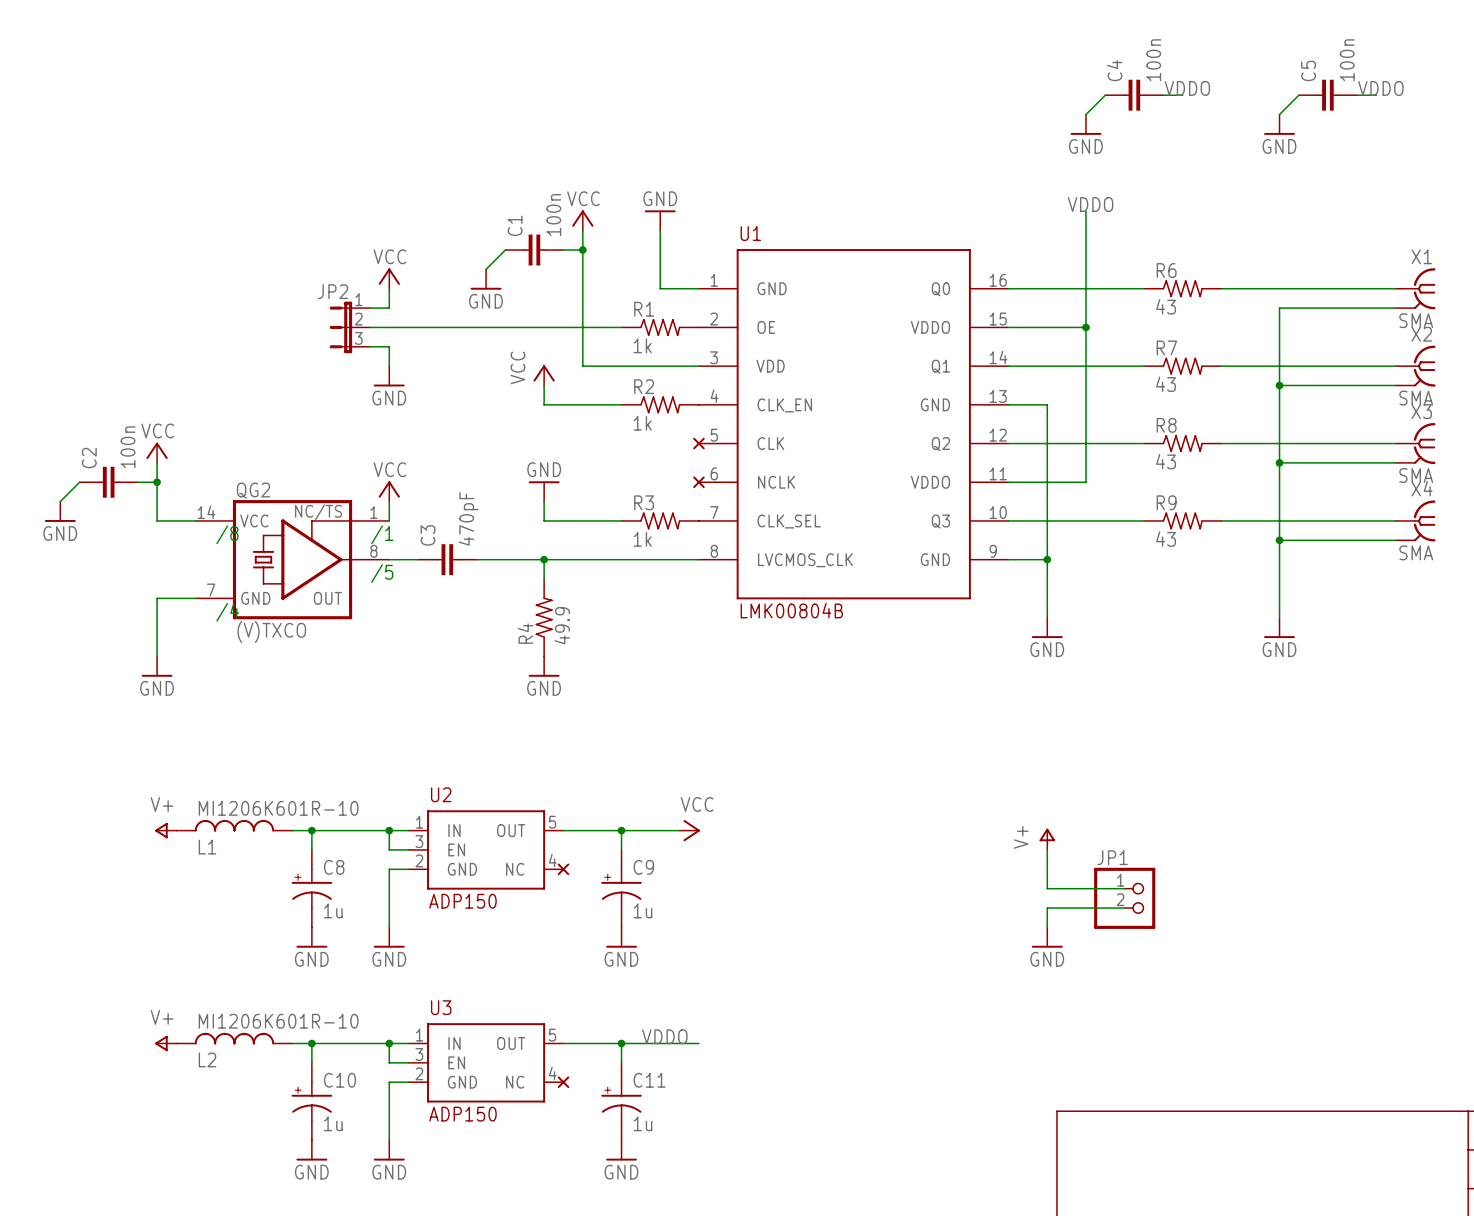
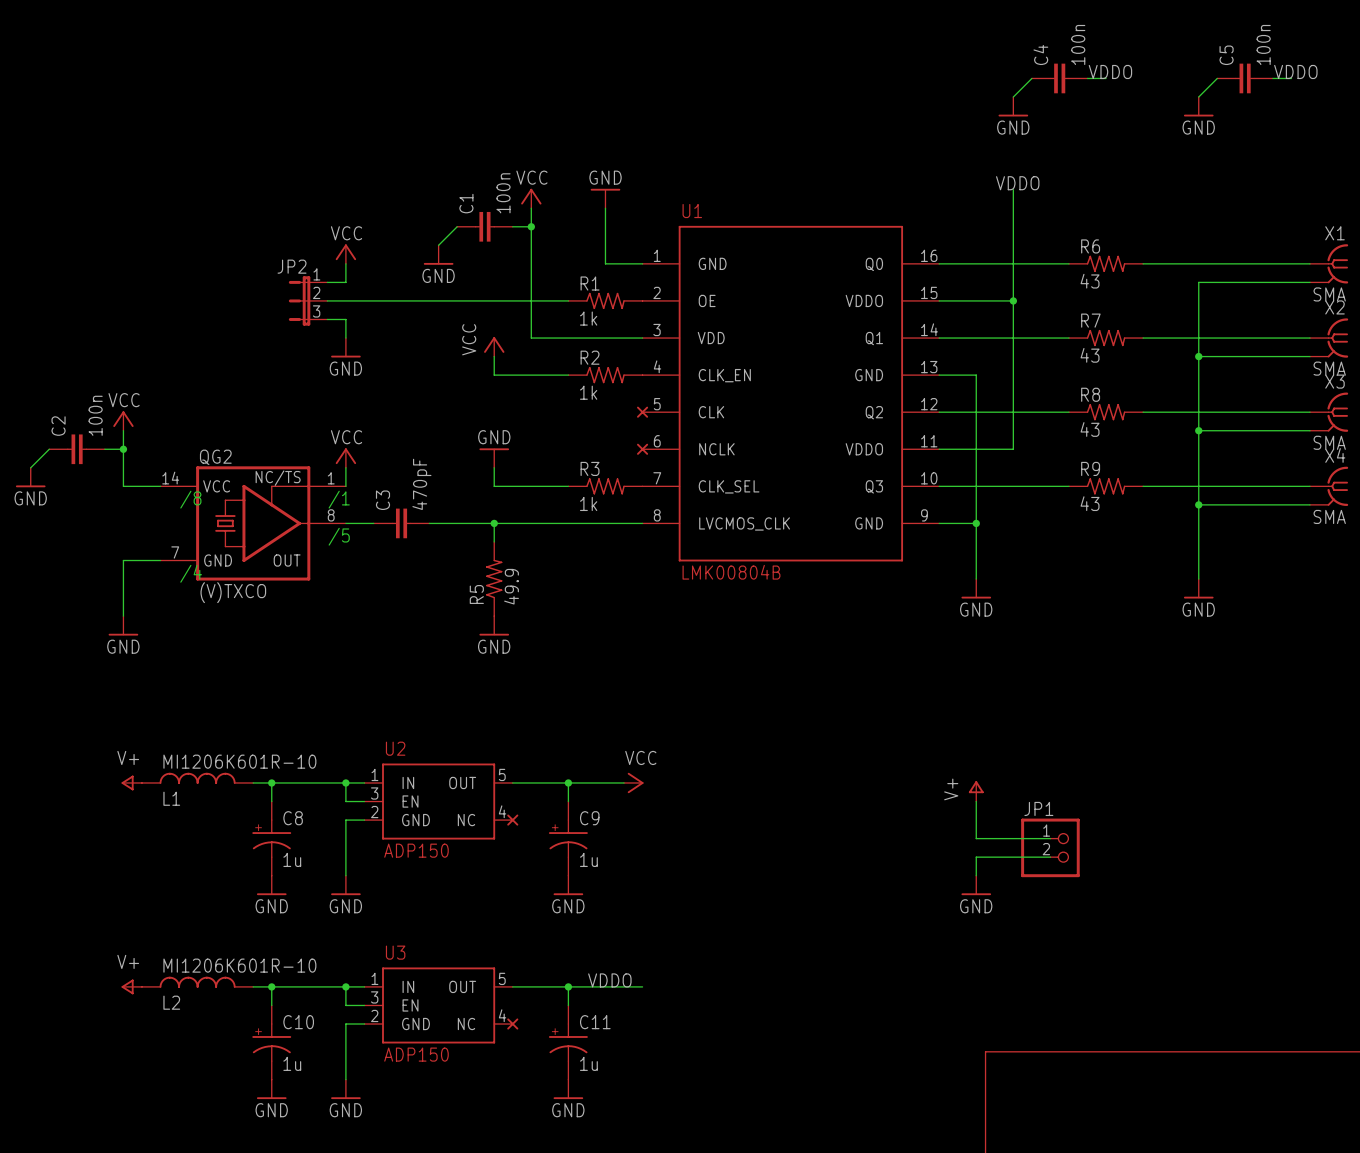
R4 name: R4 (525, 633) -> R5 (476, 594)

